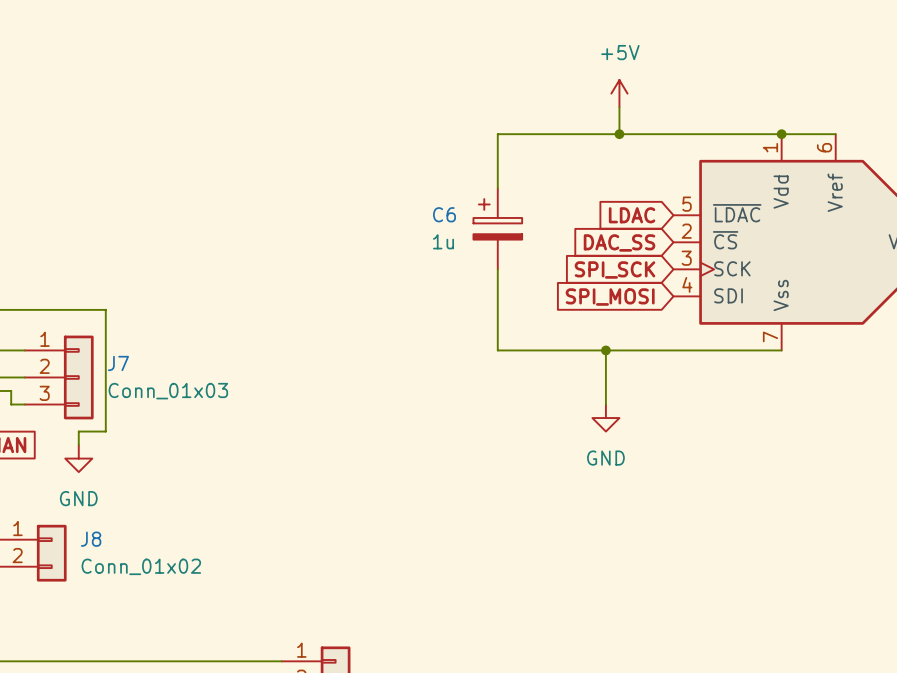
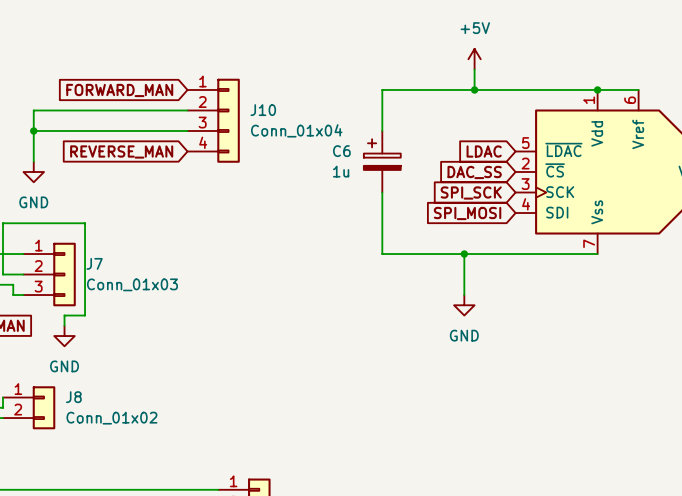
global label: none -> FORWARD_MAN (119, 90)
wire: none -> (187, 110) (33, 110) (33, 161)
J10: none -> Conn_01x04 (213, 120)
wire: none -> (33, 130) (187, 130)
junction: none -> (33, 130)
global label: none -> REVERSE_MAN (121, 151)
power symbol: none -> GND (33, 172)

